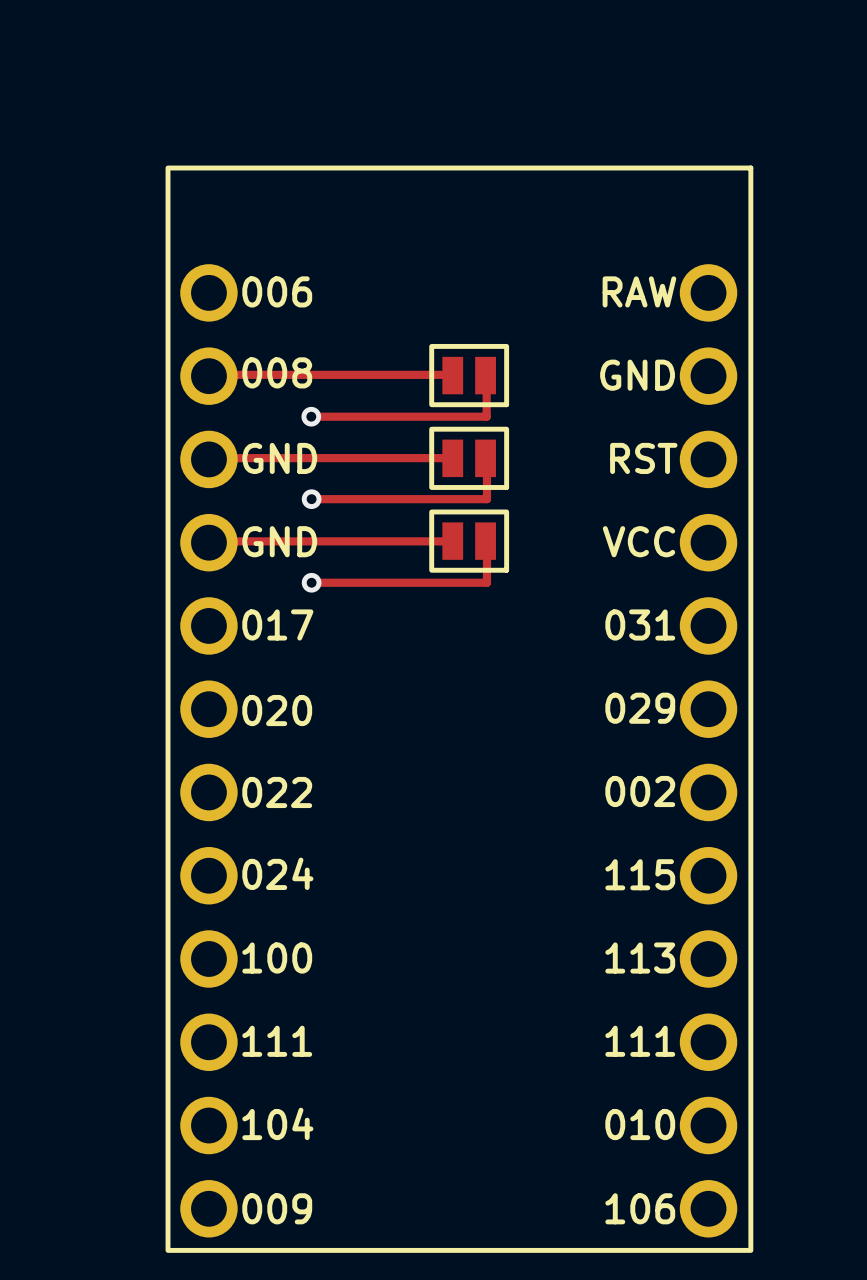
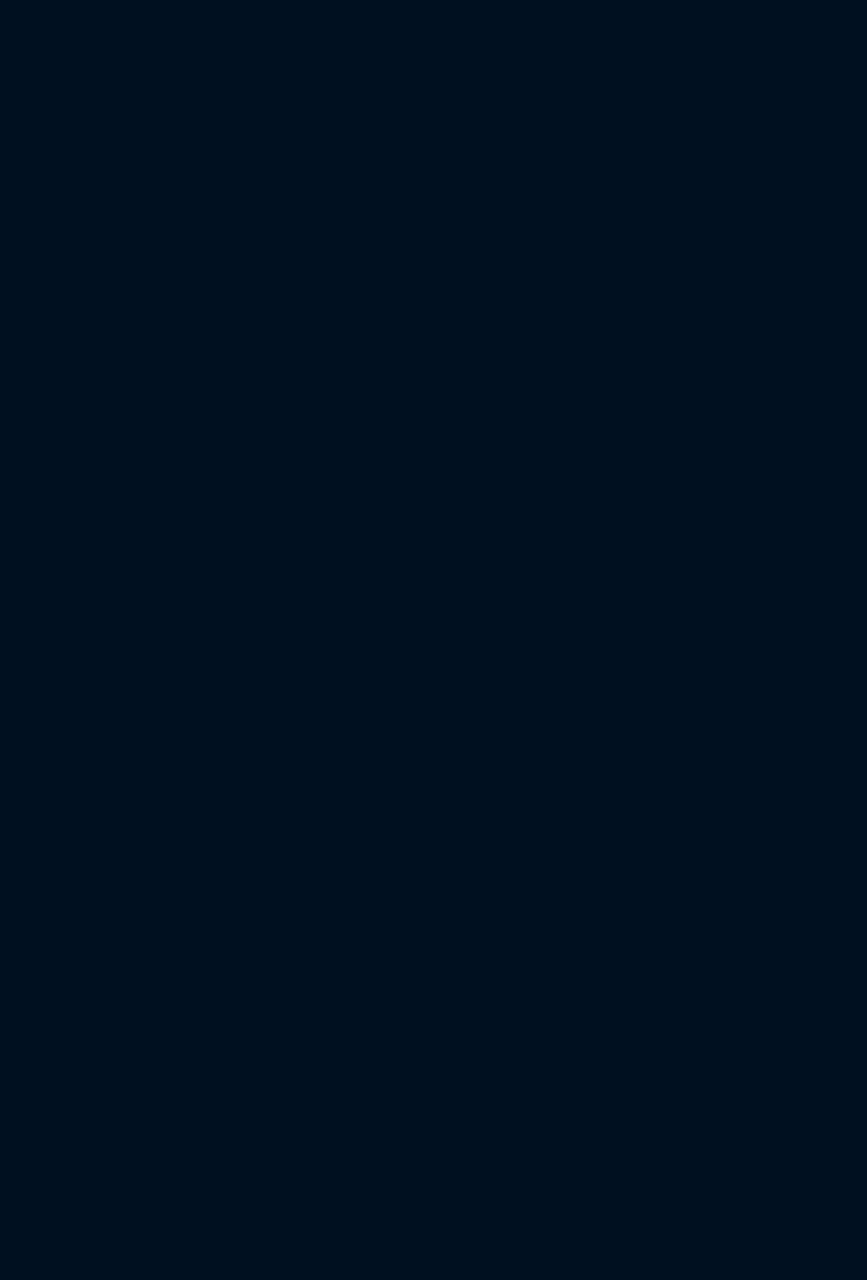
track: (219, 374) (452, 375) -> none
part: (469, 375) -> none
track: (486, 378) (486, 416) (312, 416) -> none
via: (311, 416) -> none
track: (219, 458) (452, 458) -> none
part: (469, 458) -> none
track: (487, 460) (487, 499) (313, 499) -> none
via: (311, 499) -> none
track: (219, 541) (452, 541) -> none
part: (469, 541) -> none
track: (487, 544) (487, 582) (313, 582) -> none
via: (311, 582) -> none
part: (459, 709) -> none

